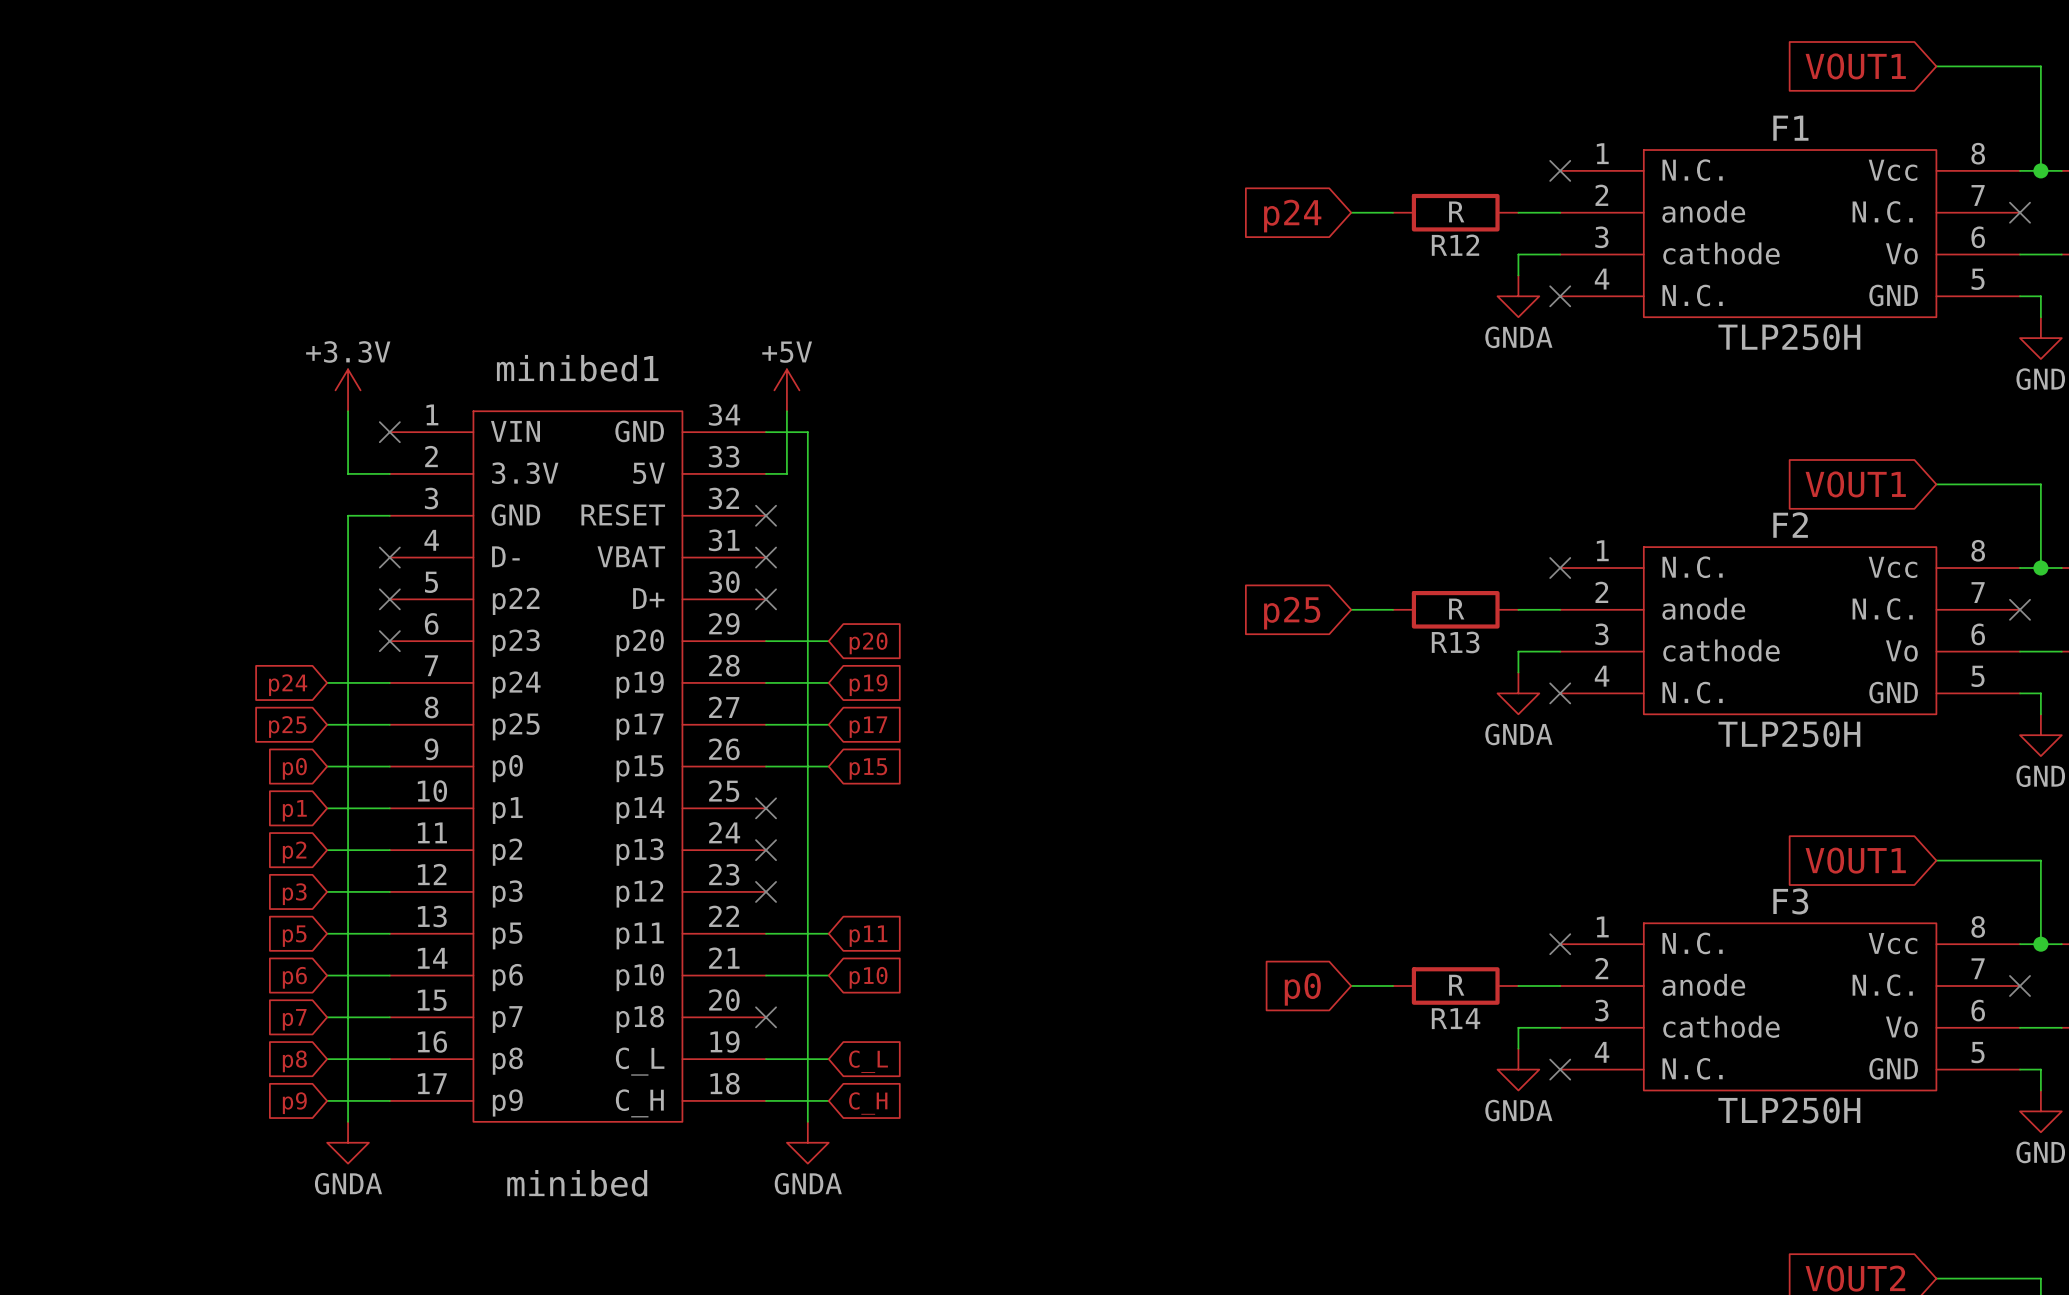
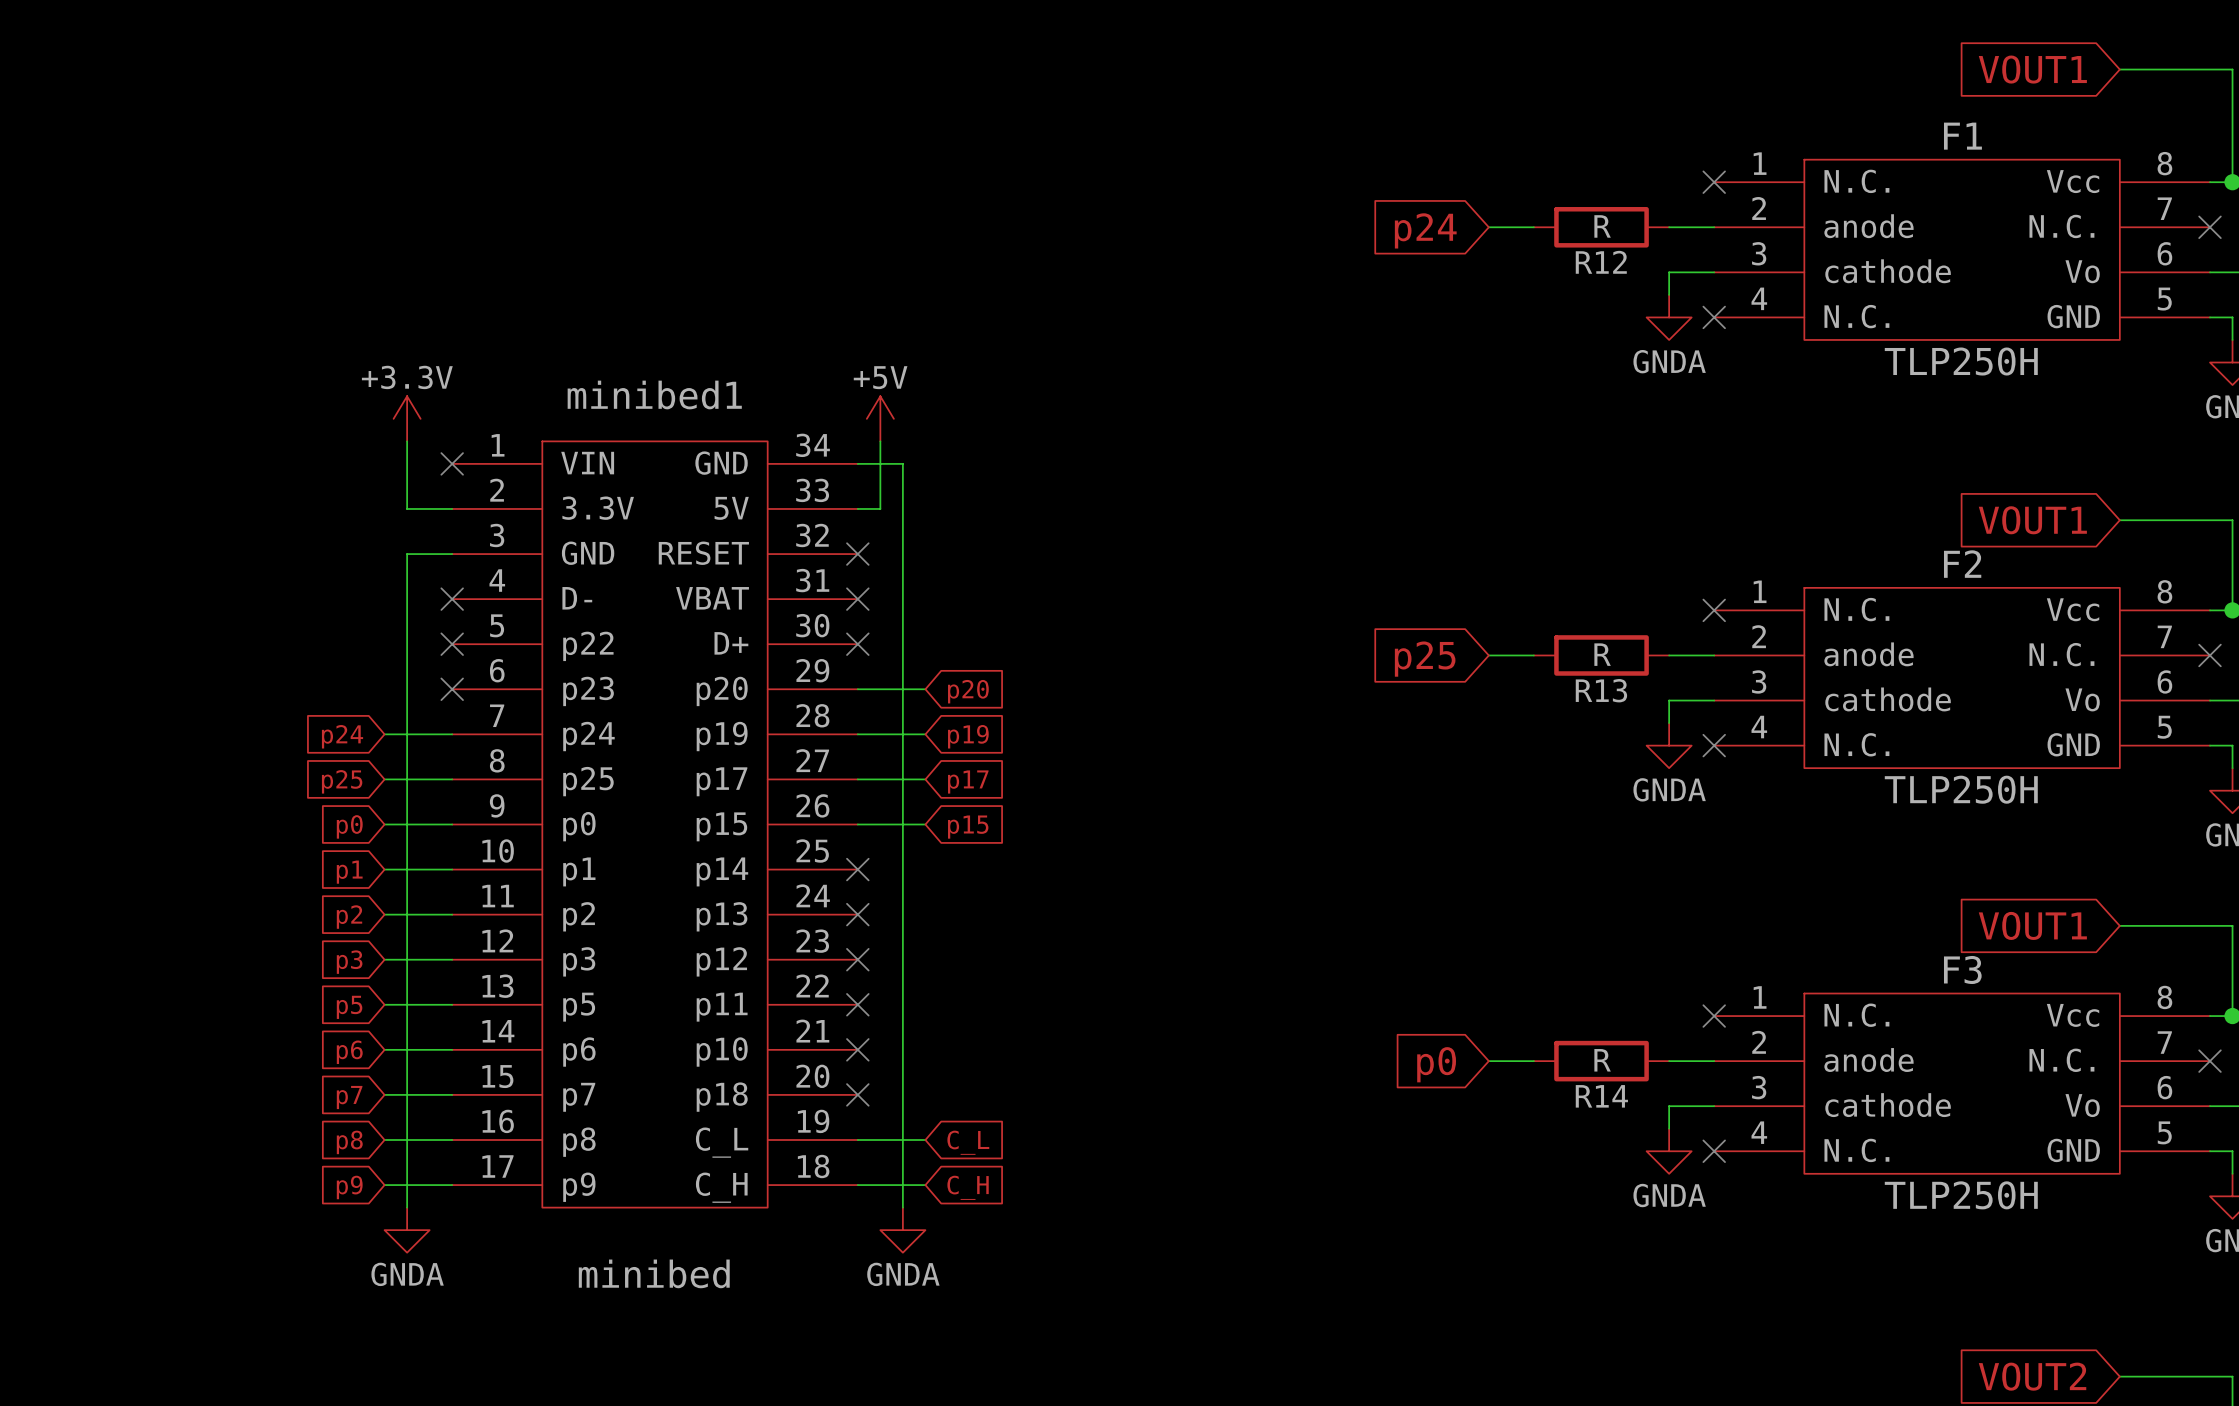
wire: (766, 933) (828, 933) -> none
no-connect mark: none -> (857, 1004)
global label: p11 (868, 936) -> none
wire: (766, 975) (828, 975) -> none
no-connect mark: none -> (857, 1049)
global label: p10 (868, 977) -> none

